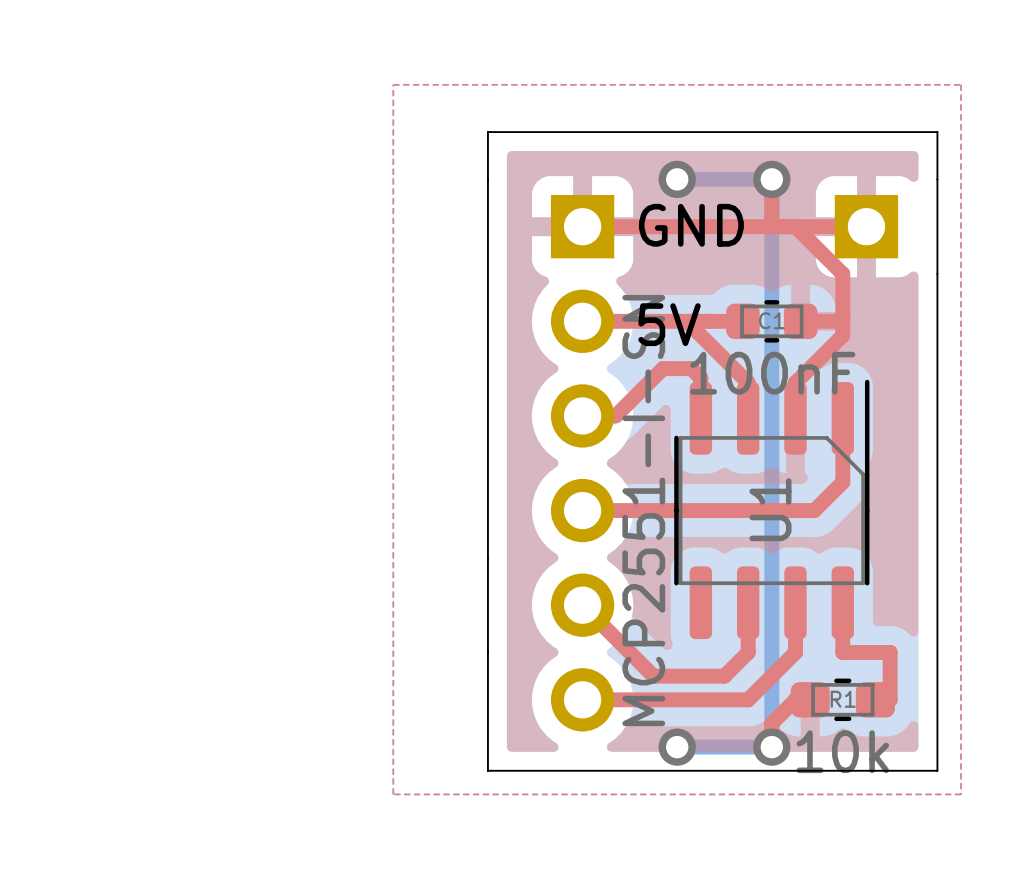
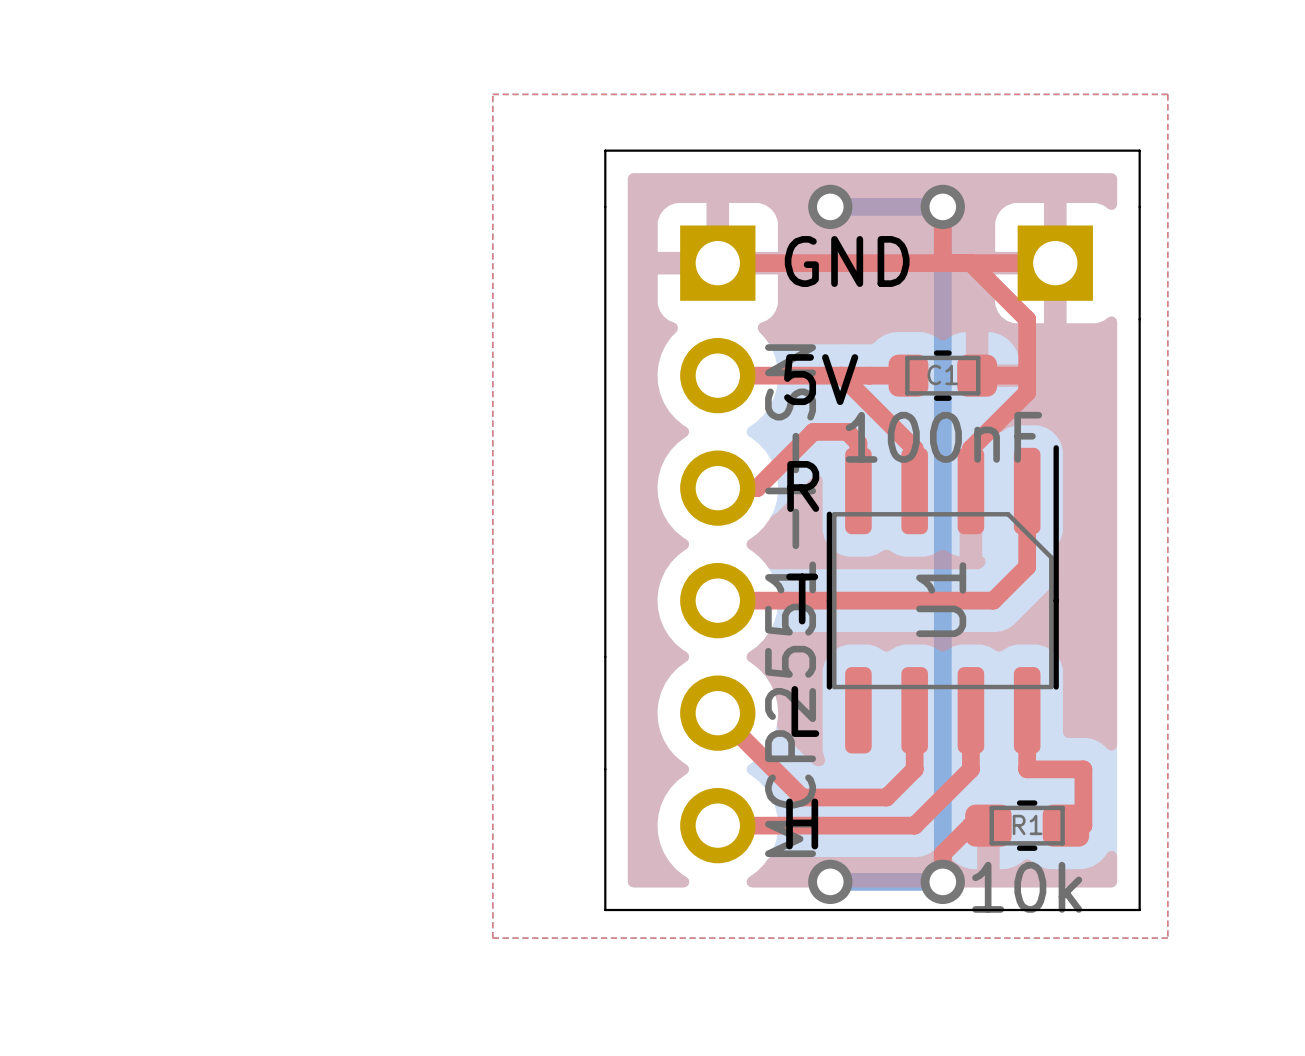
text: none -> R (803, 486)
text: none -> T (802, 598)
text: none -> L (805, 711)
text: none -> H (802, 823)

